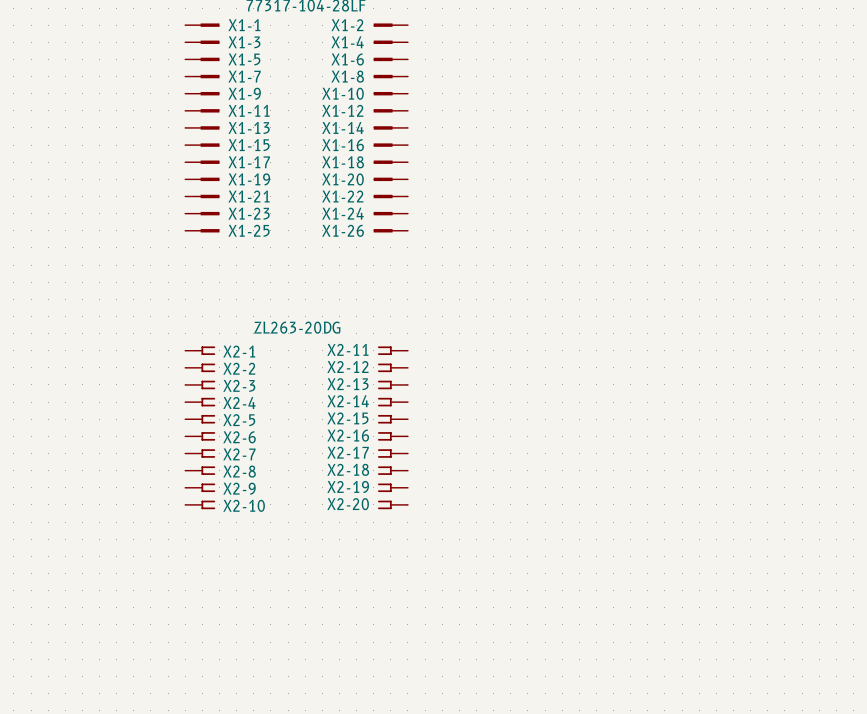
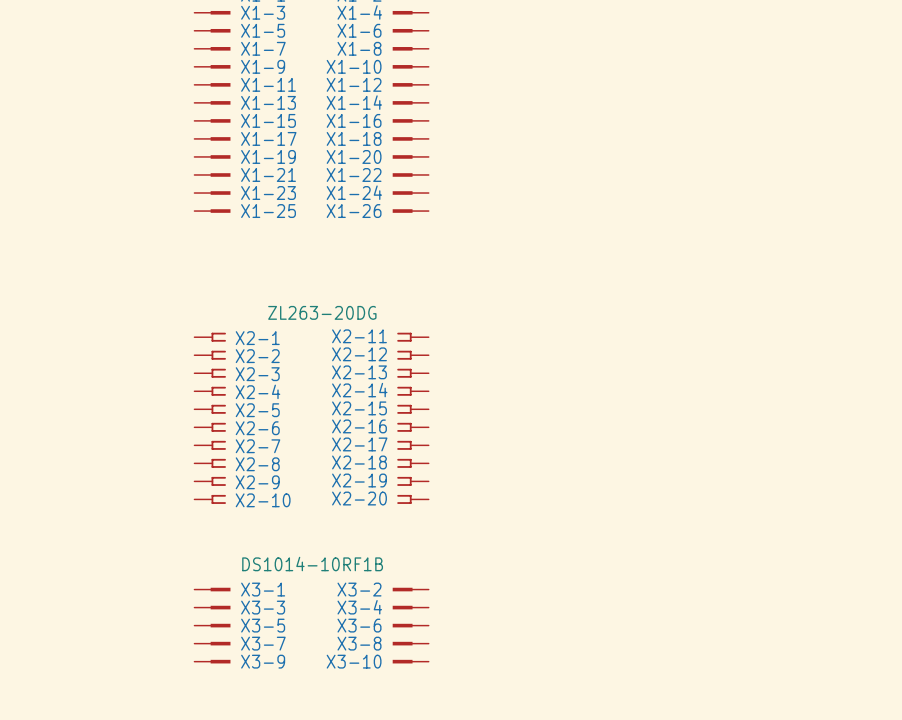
X3-1: none -> DS1014-10RF1B (212, 589)
X3-2: none -> (410, 589)
X3-3: none -> (212, 607)
X3-4: none -> (410, 607)
X3-5: none -> (212, 625)
X3-6: none -> (410, 625)
X3-7: none -> (212, 643)
X3-8: none -> (410, 643)
X3-9: none -> (212, 661)
X3-10: none -> (410, 661)

